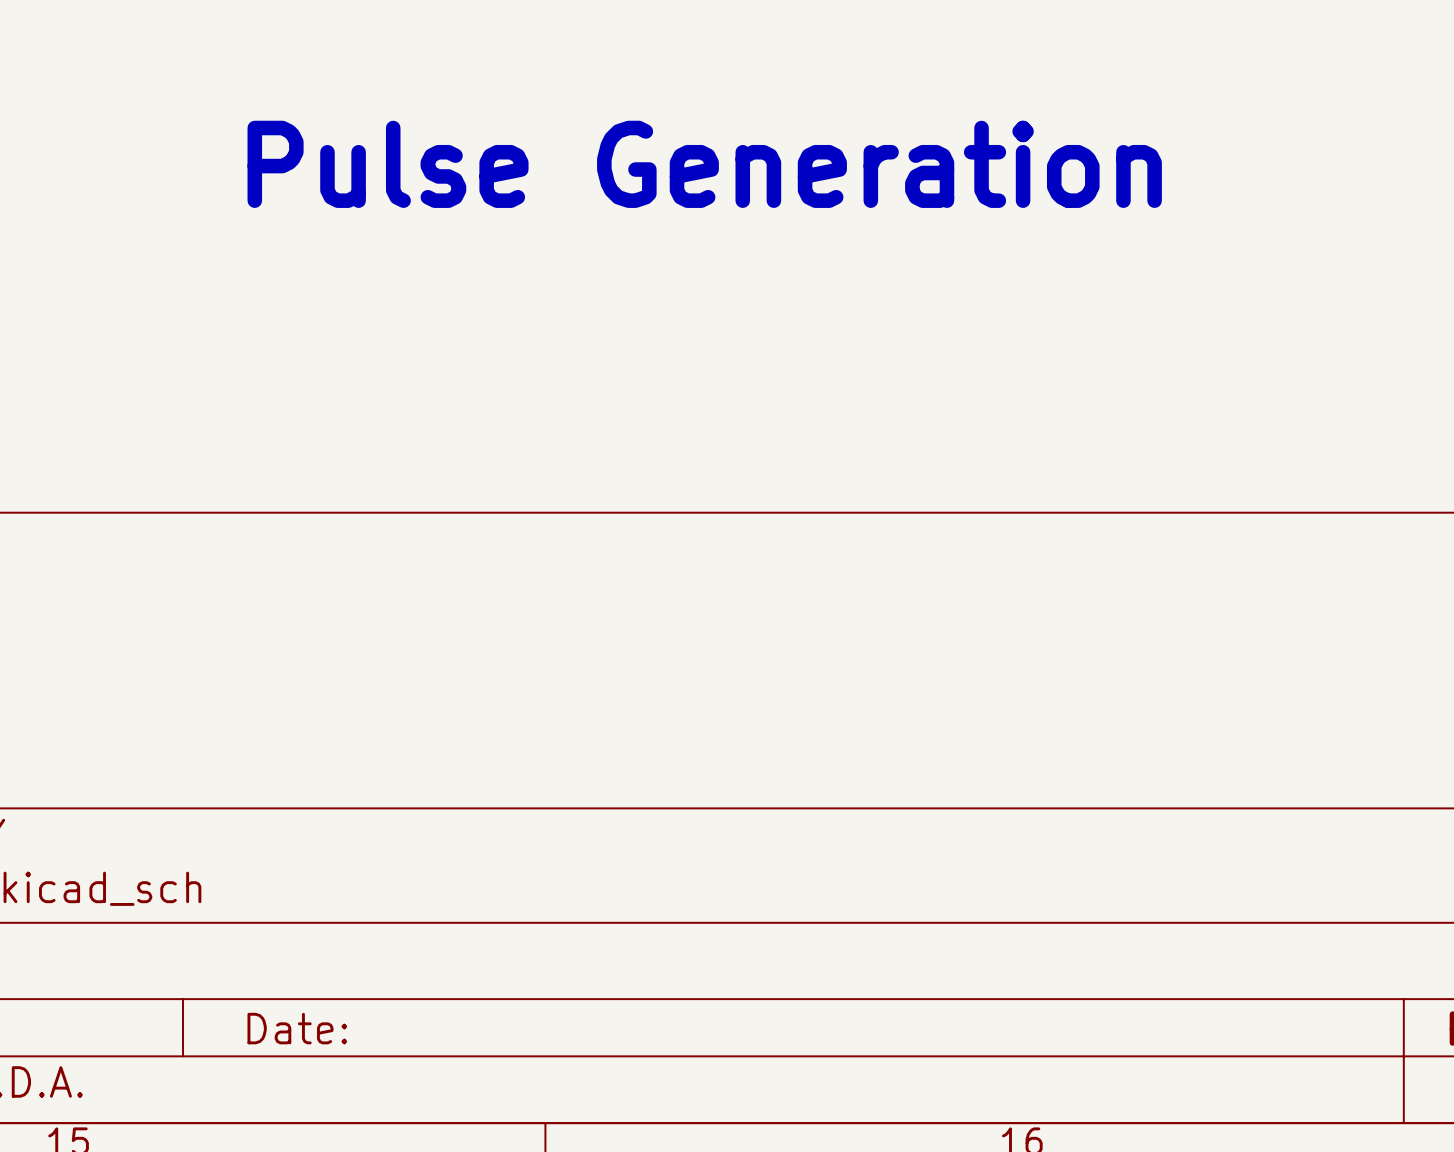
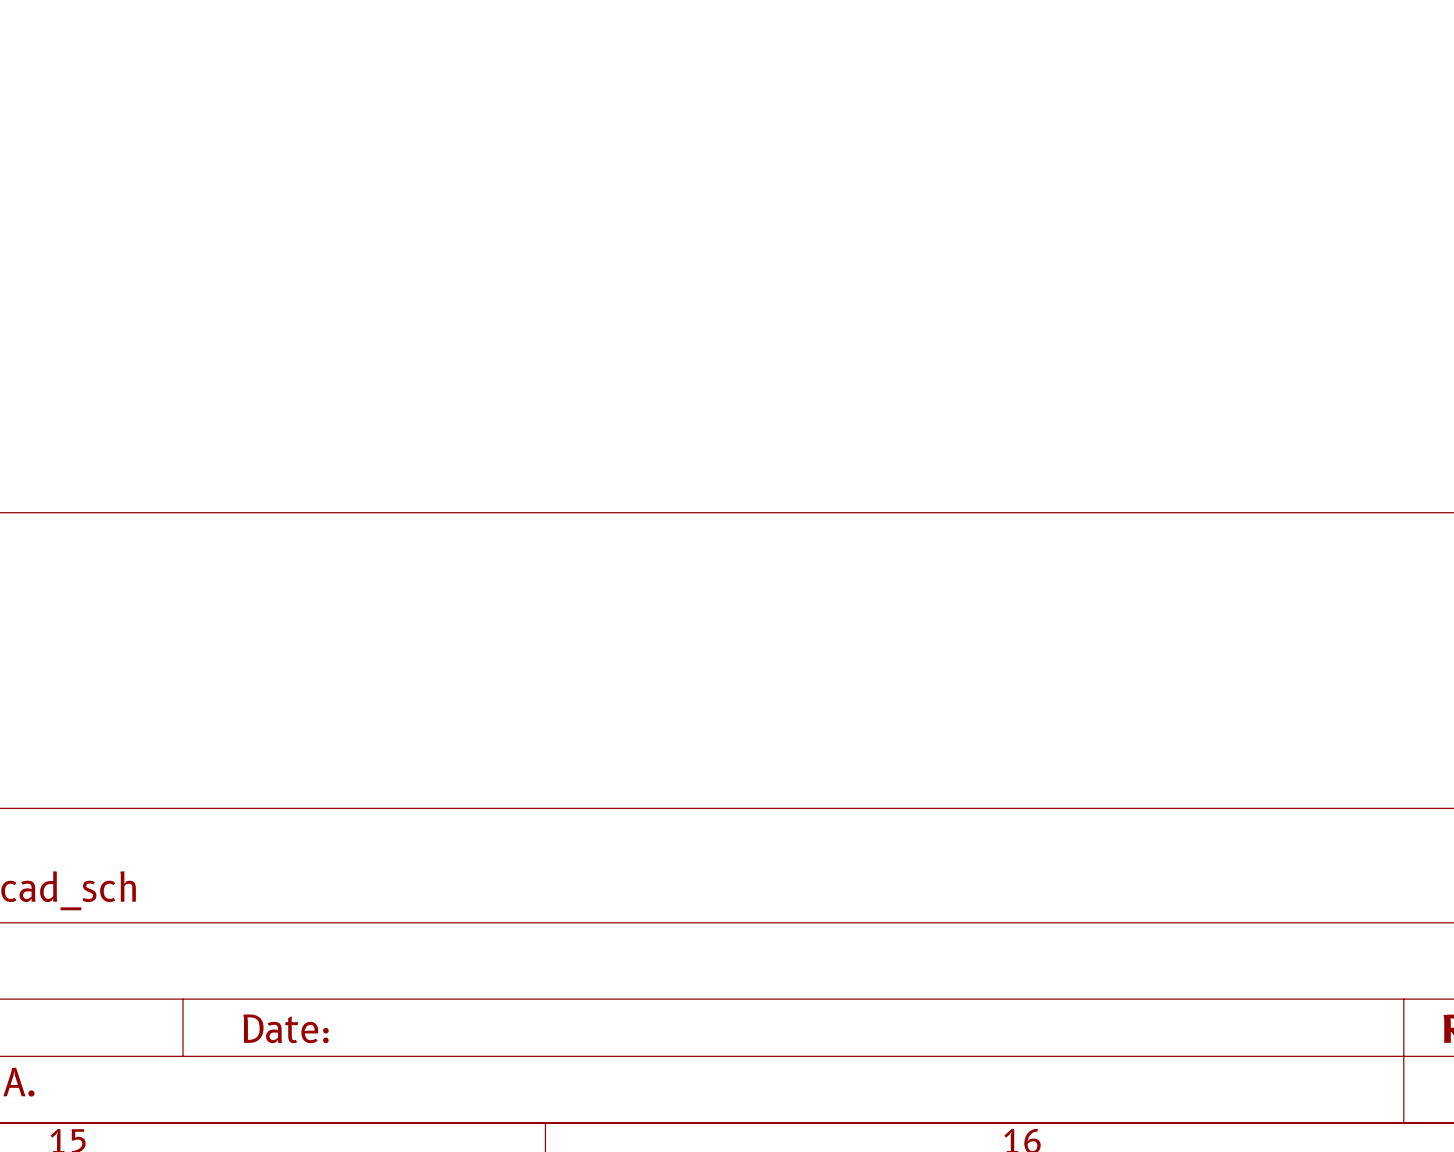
text: Pulse Generation (704, 164) -> none

